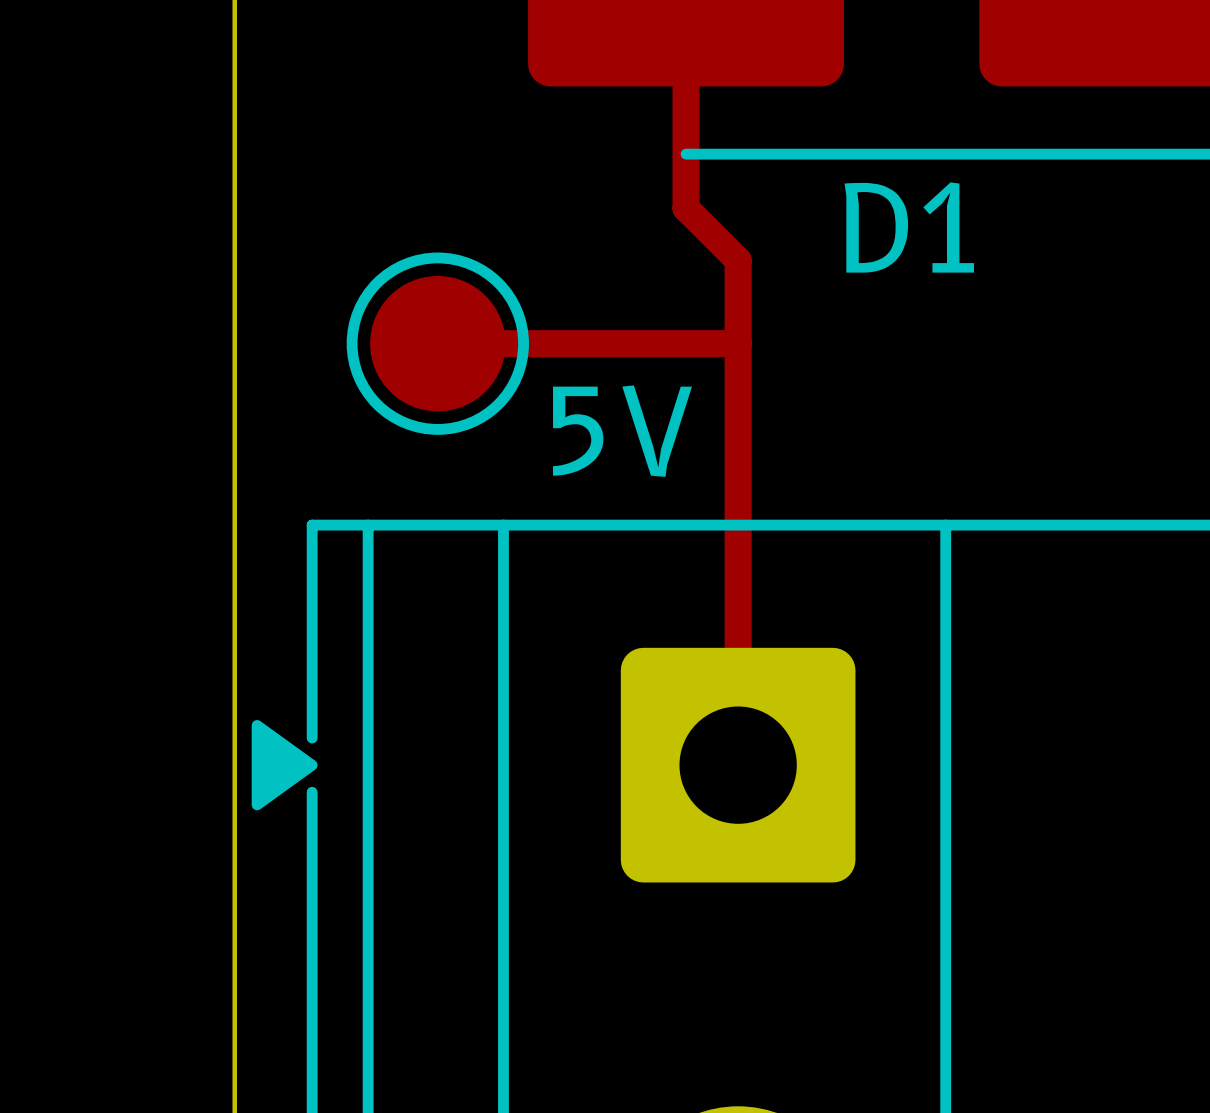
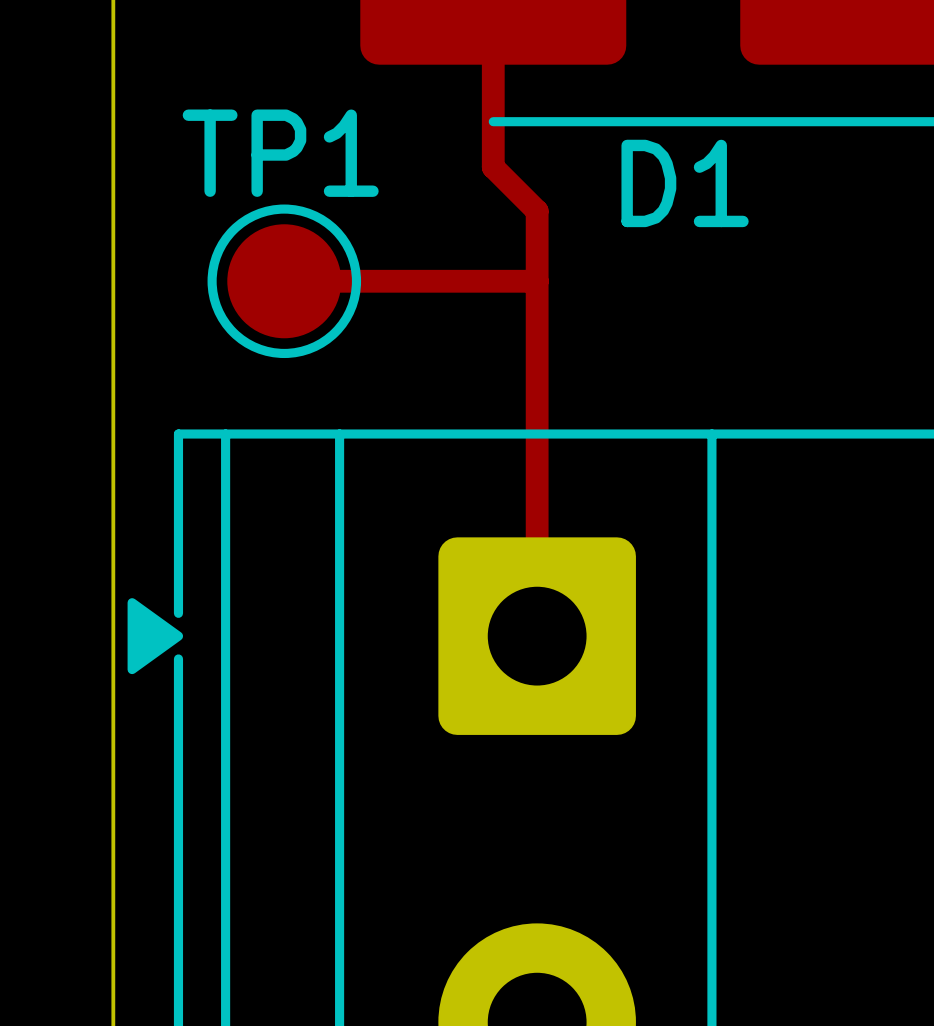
TP1 name: none -> TP1 (280, 153)
TP1 value: 5V (622, 431) -> none

